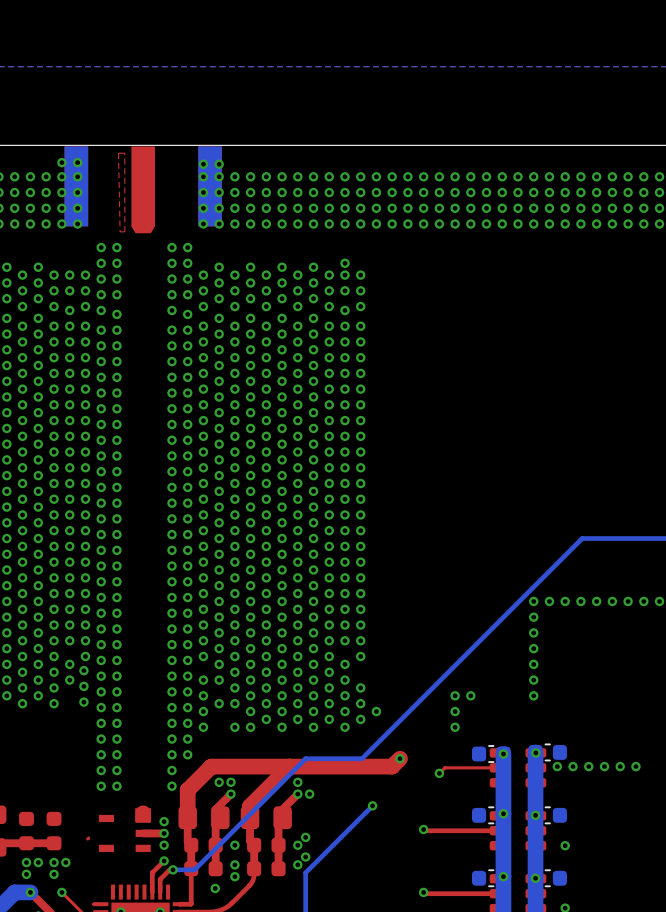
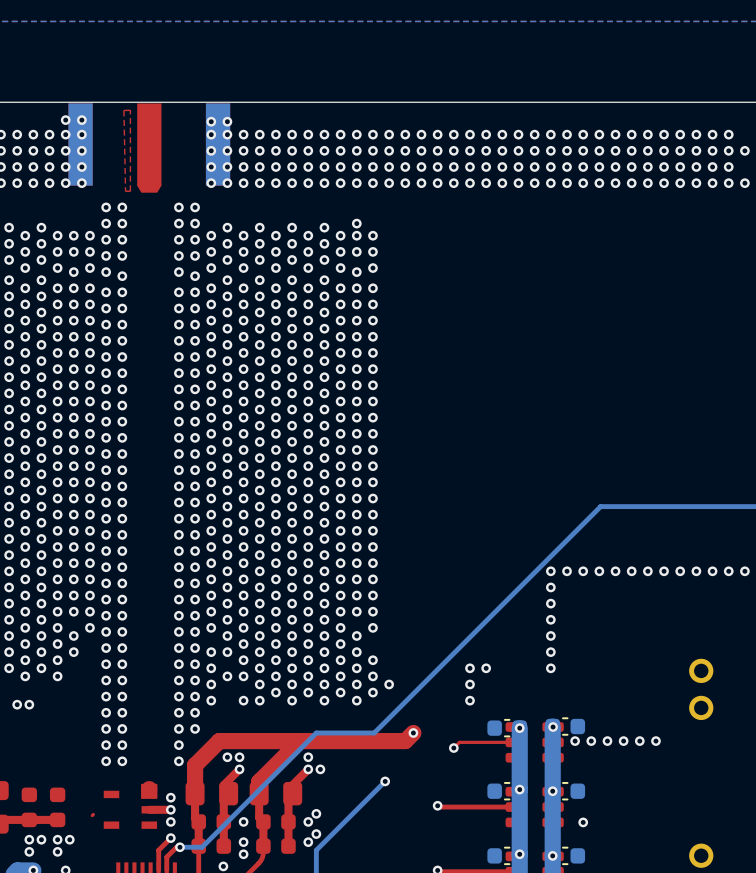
via: (83, 670) -> none
via: (83, 686) -> none
via: (83, 702) -> none
via: none -> (17, 704)
via: none -> (29, 704)

